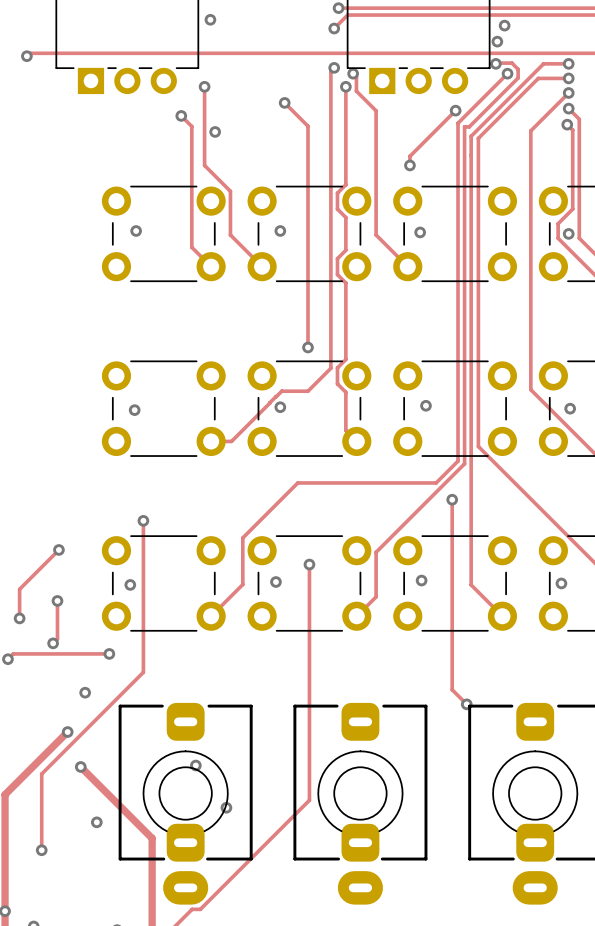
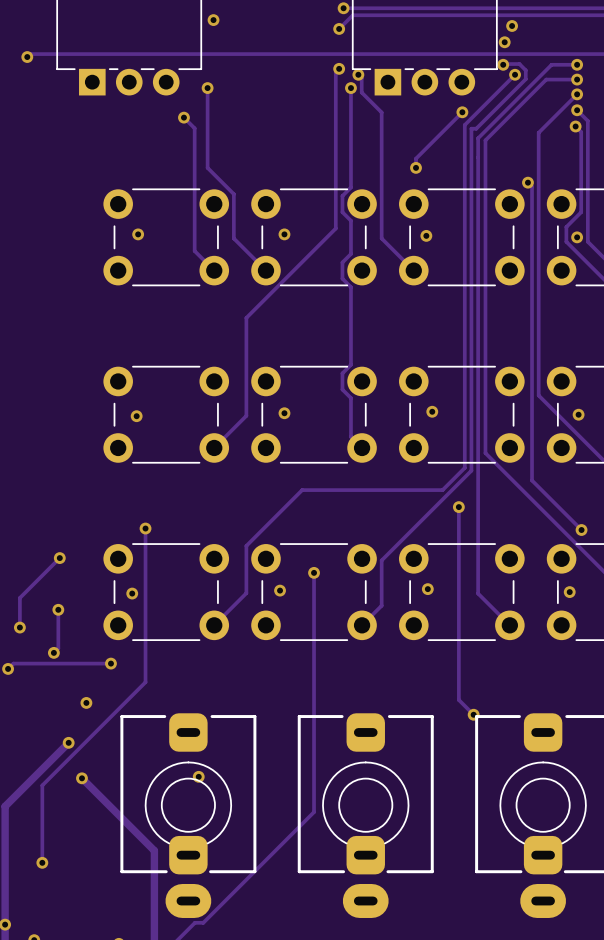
track: (284, 102) (308, 126) (308, 347) -> none
via: (284, 102) -> none
via: (215, 131) -> none
track: none -> (527, 182) (532, 186) (532, 480) (581, 530)
via: none -> (527, 182)
track: (330, 225) (330, 368) (308, 391) (281, 391) (231, 441) (211, 441) -> (335, 228) (246, 317) (246, 415) (214, 447)
via: (308, 347) -> none
via: none -> (581, 530)
via: (226, 807) -> none
via: (96, 822) -> none

